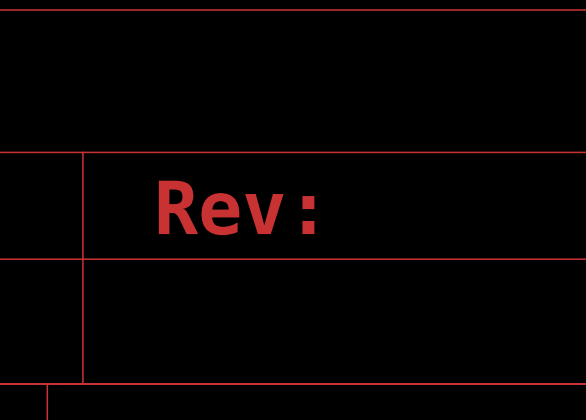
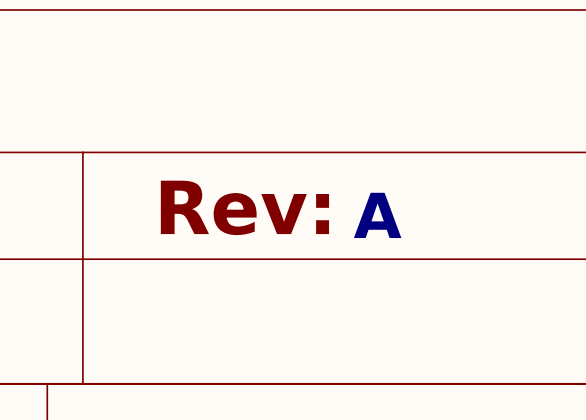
text: none -> A (377, 215)

